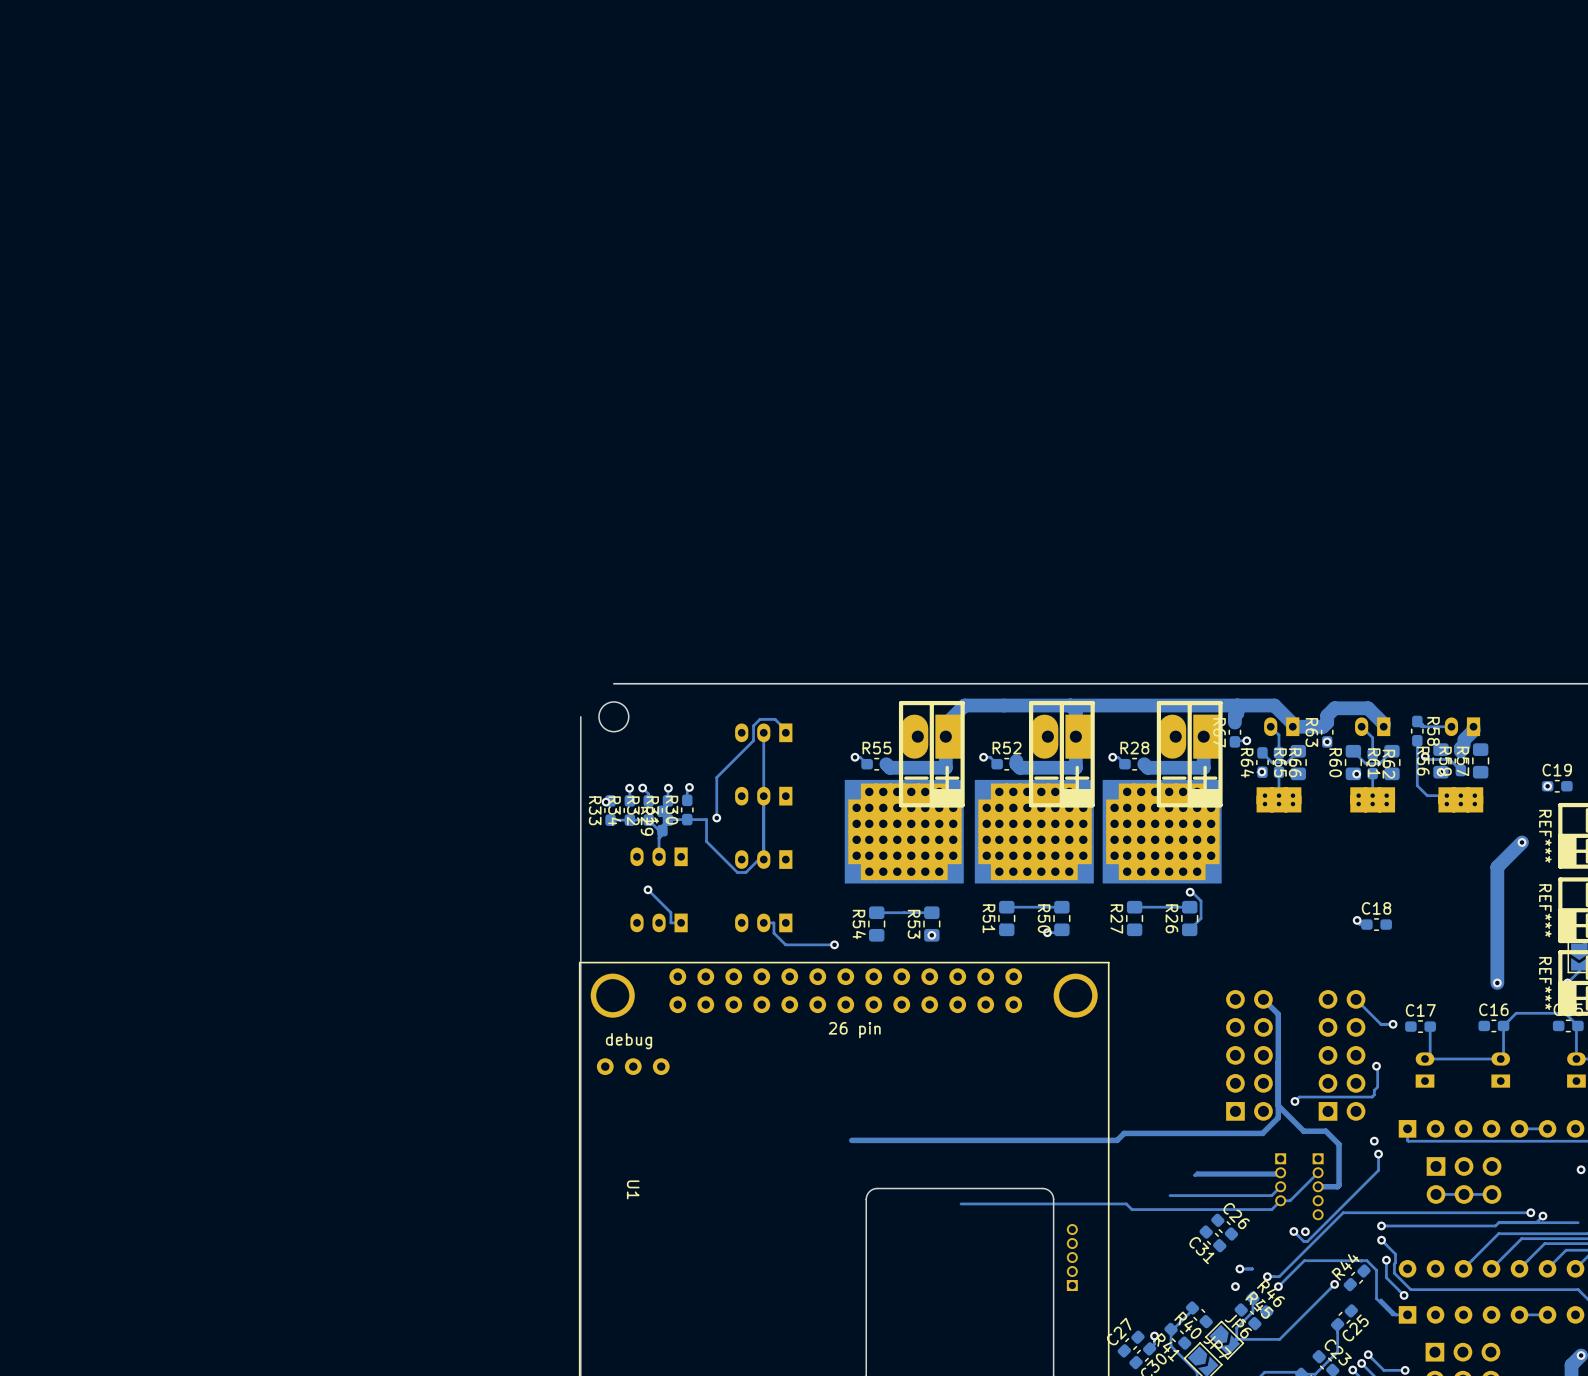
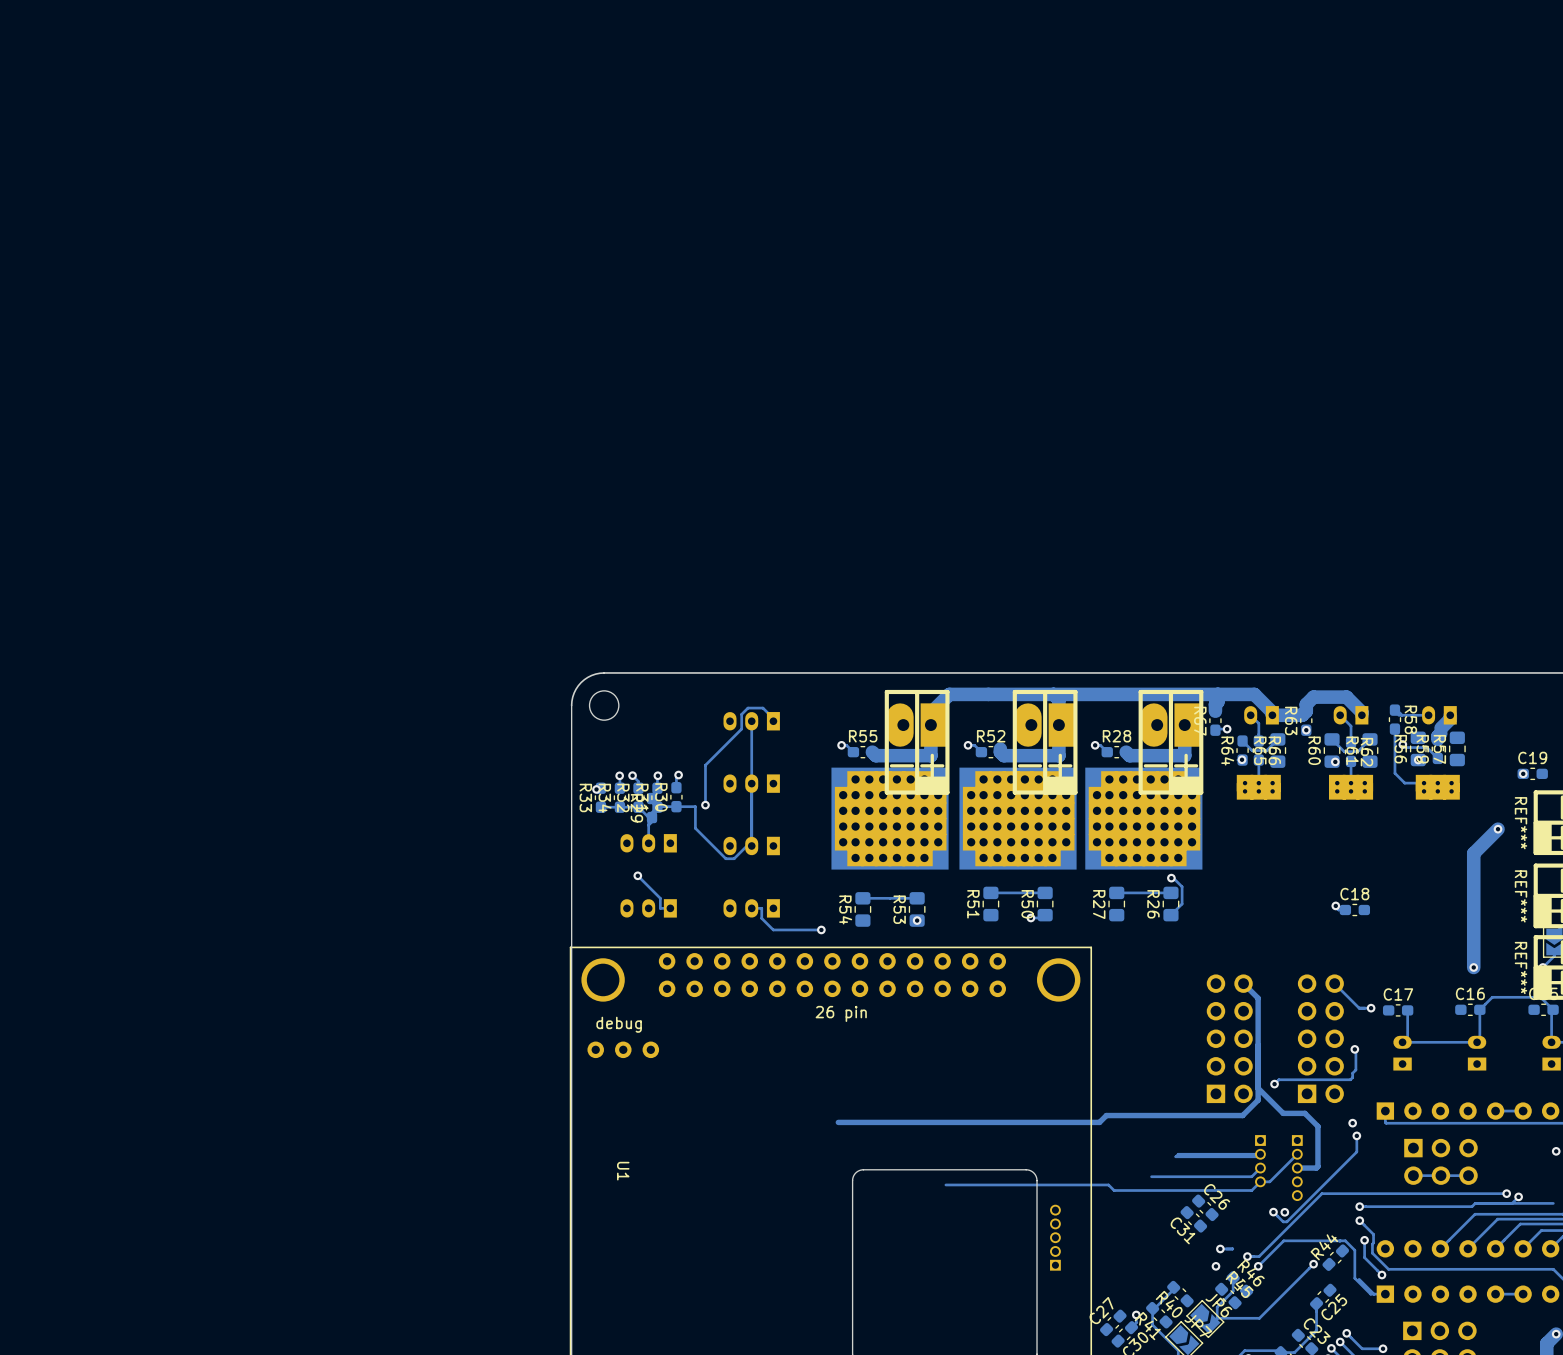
board edge: none -> (604, 672) (591, 675) (581, 682) (574, 693) (571, 705)

